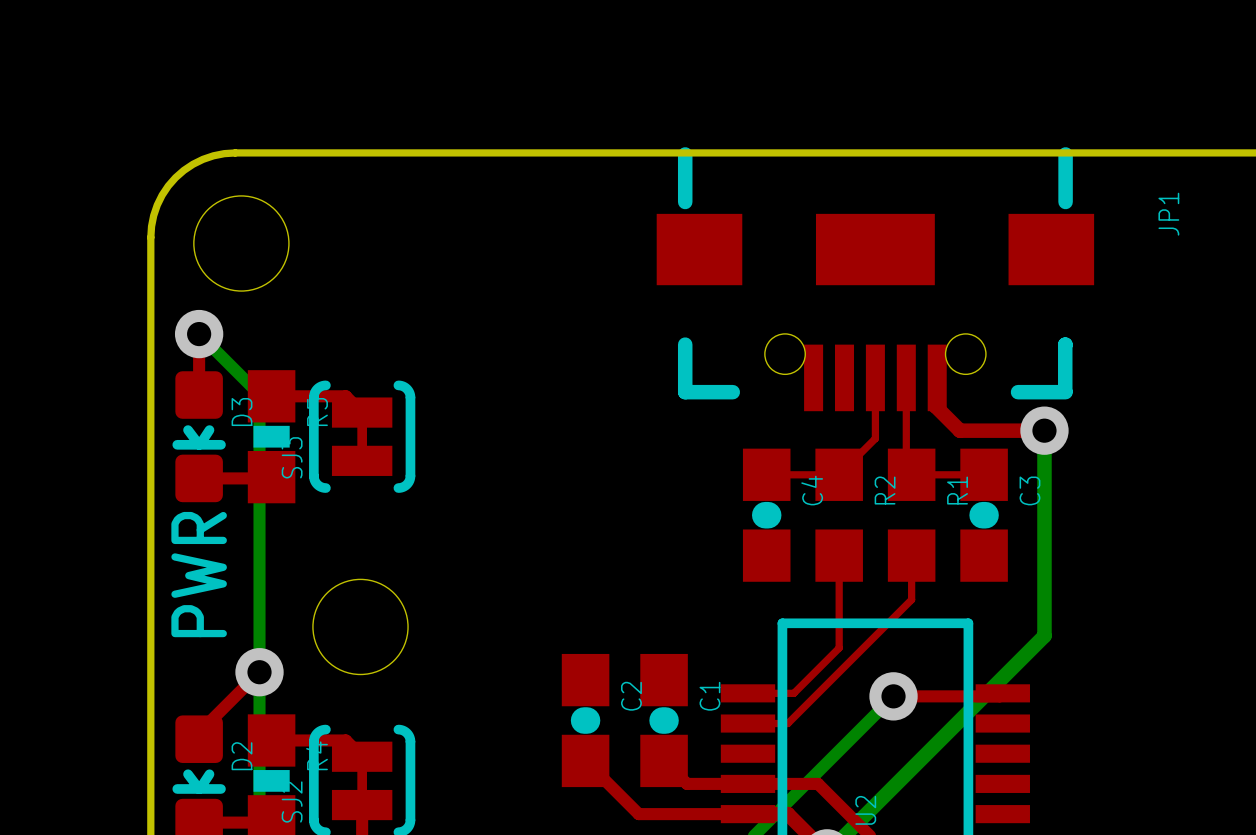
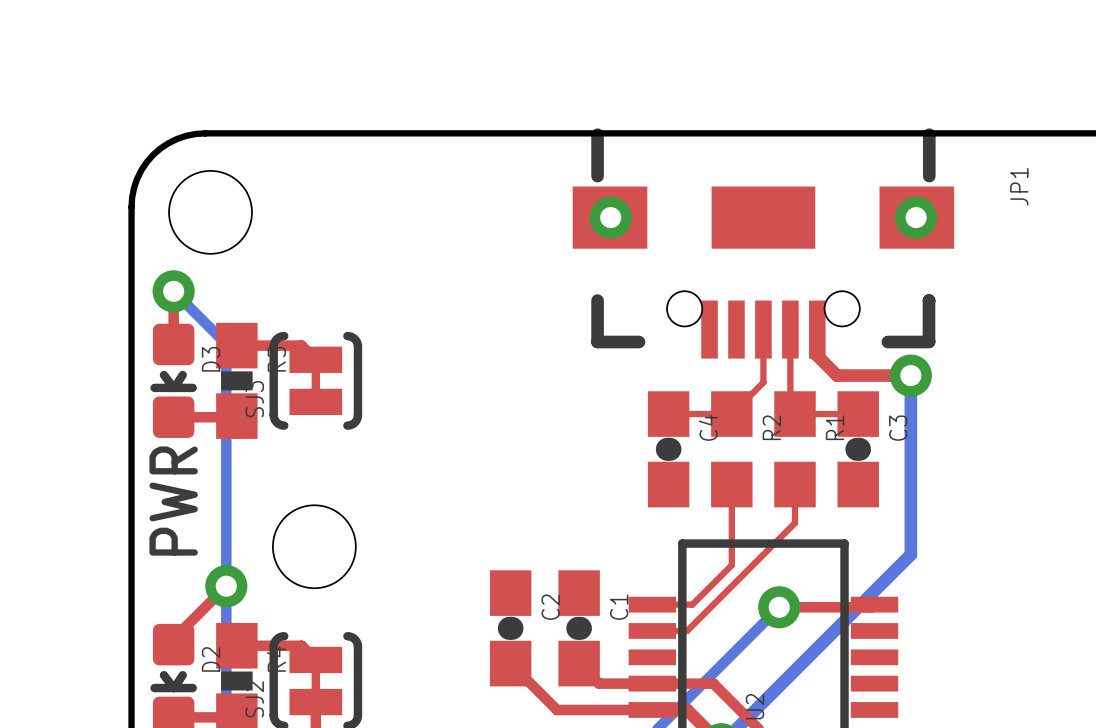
via: none -> (610, 217)
via: none -> (916, 217)

